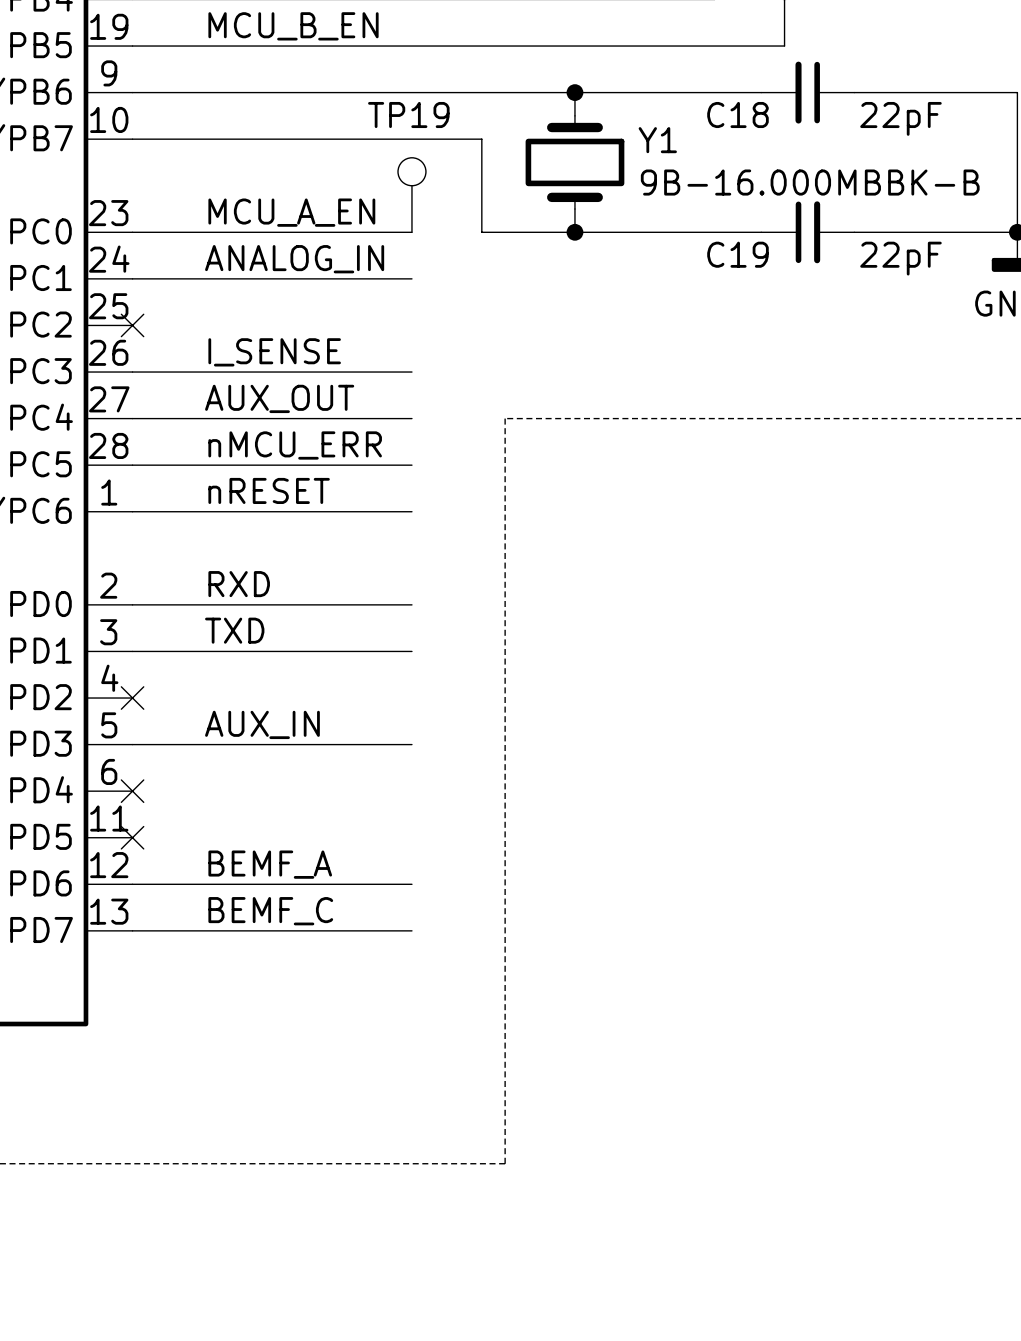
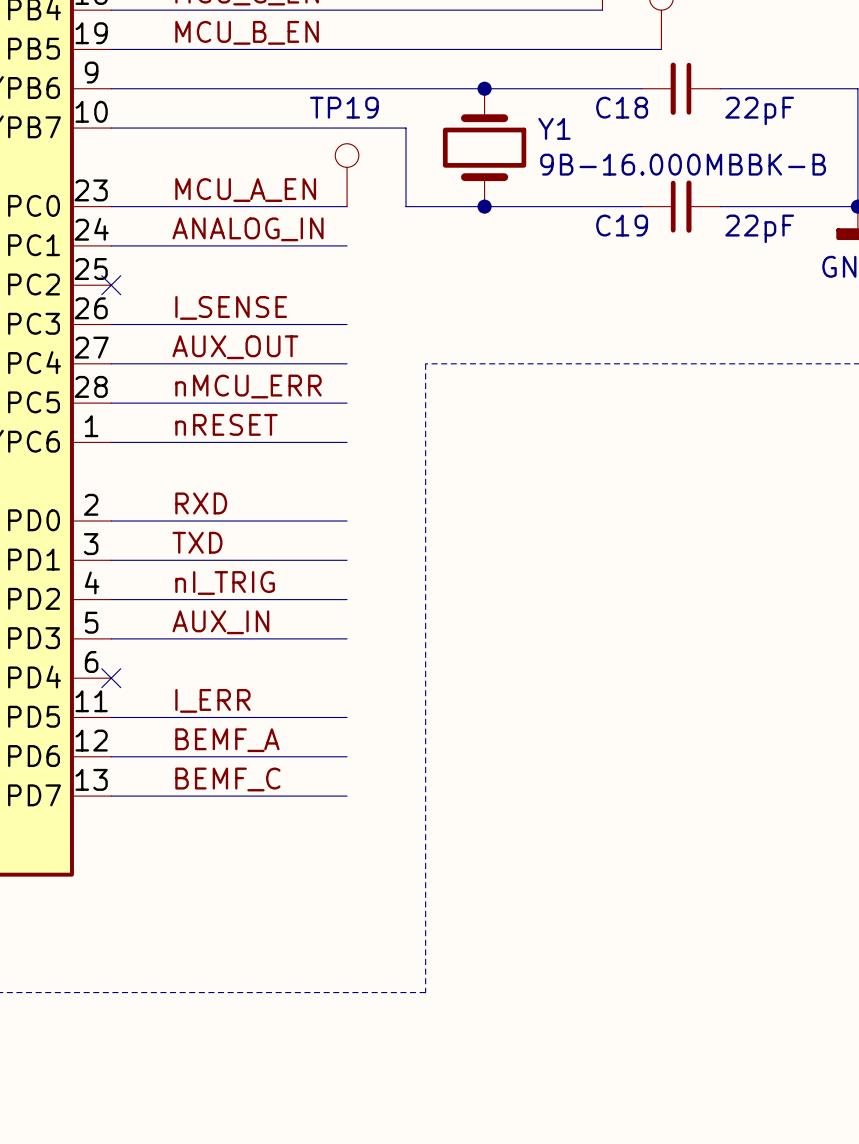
label: none -> nI_TRIG (225, 582)
wire: none -> (111, 599) (347, 599)
no-connect mark: (132, 698) -> none
label: none -> I_ERR (212, 700)
wire: none -> (111, 717) (347, 717)
no-connect mark: (132, 837) -> none

